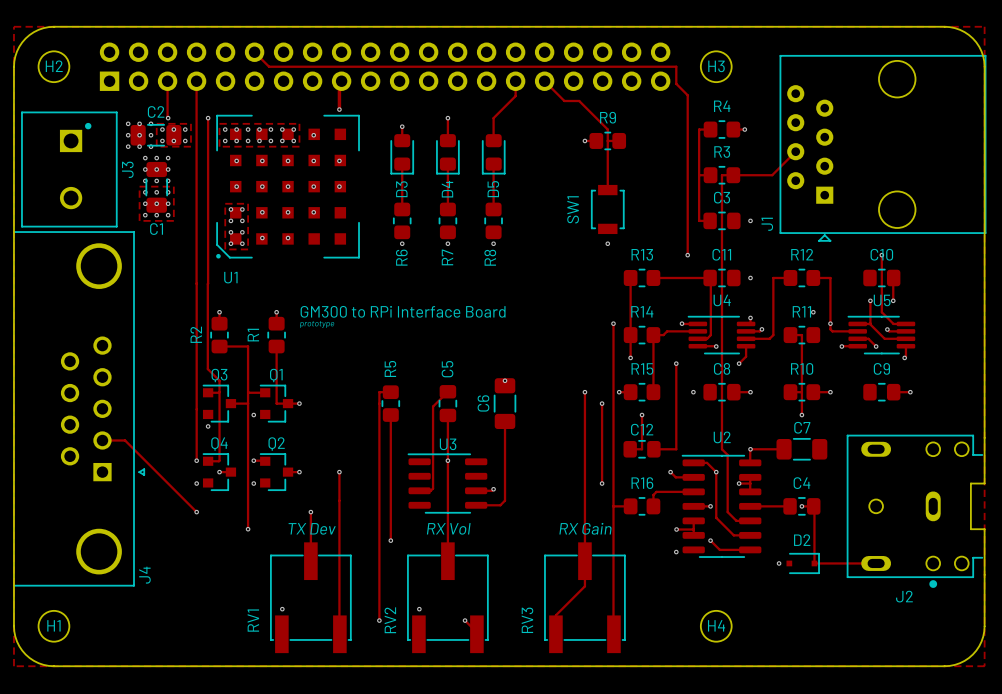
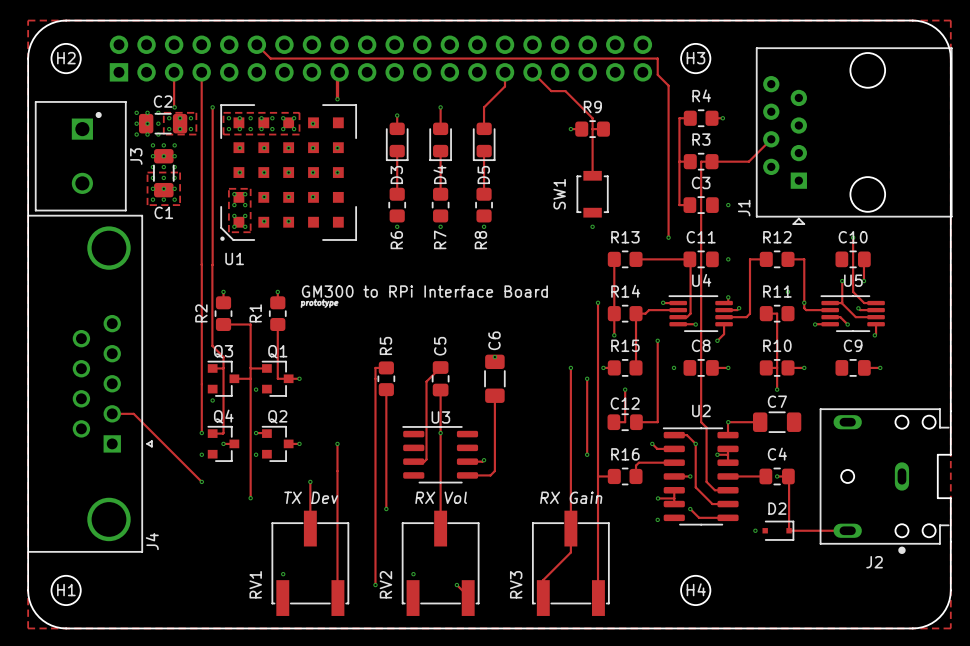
C6 name position: C6 (483, 403) -> C6 (494, 340)

